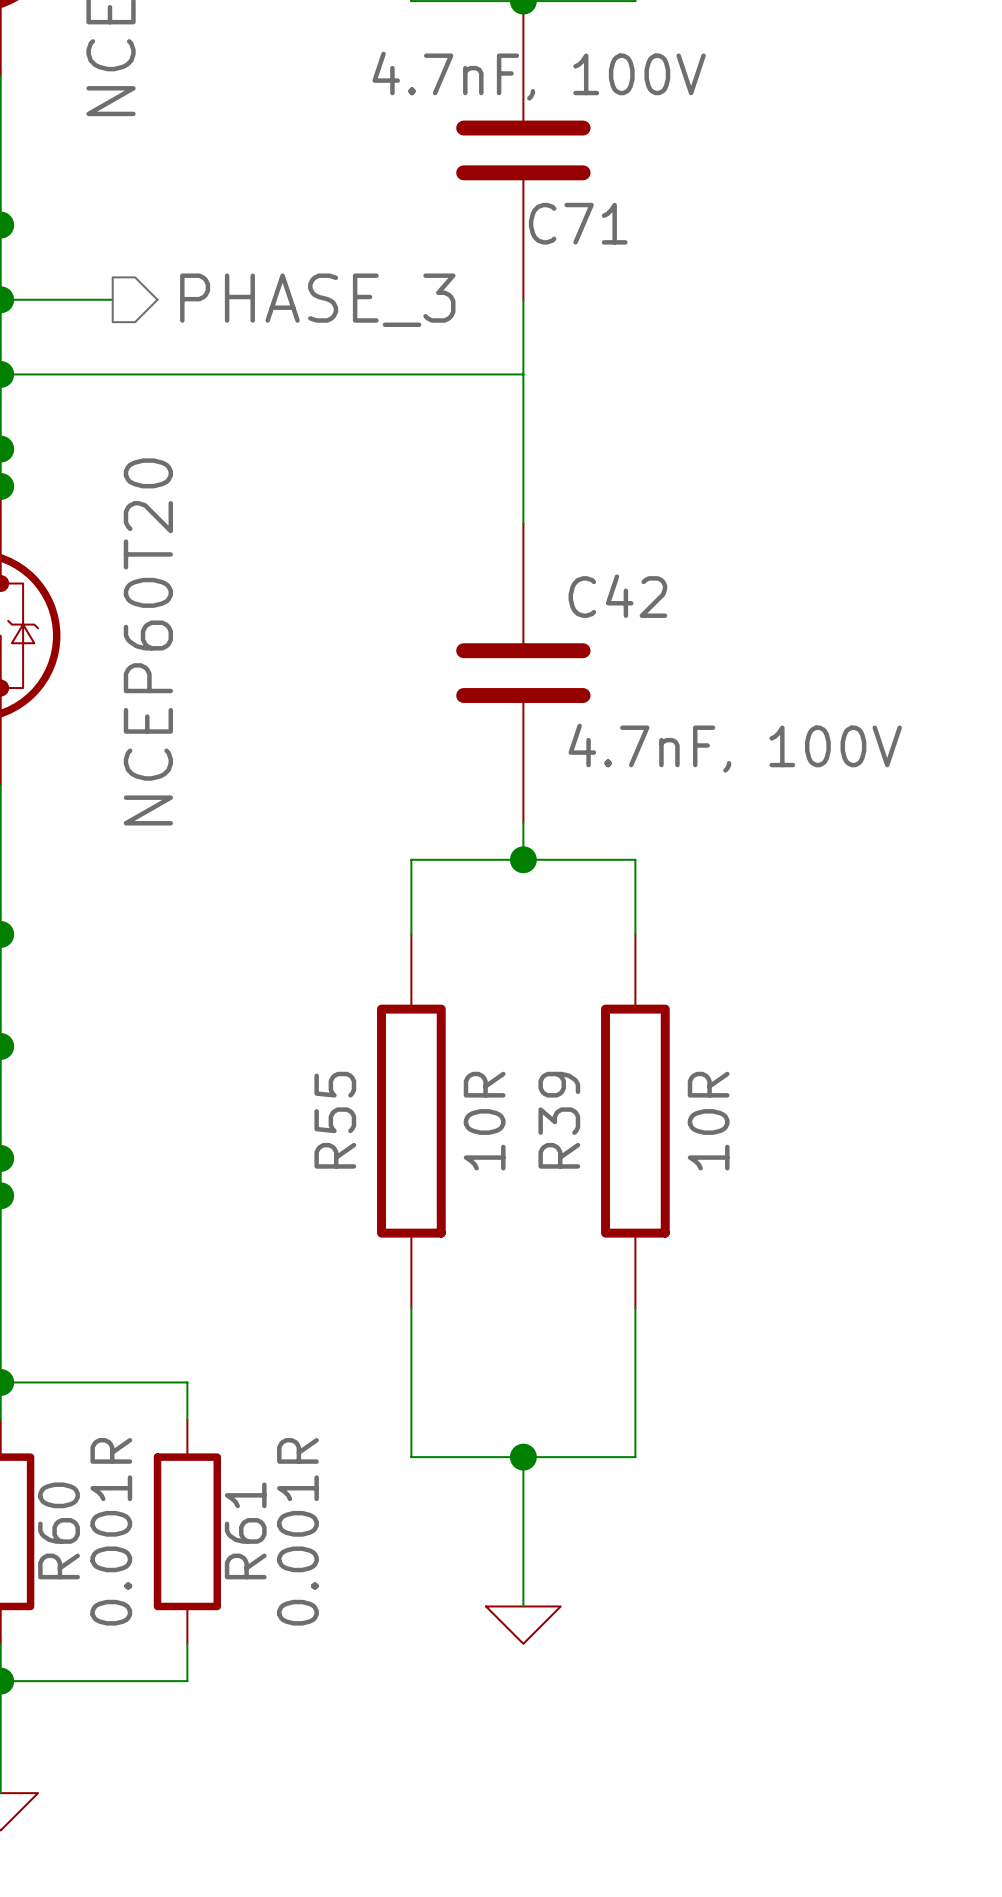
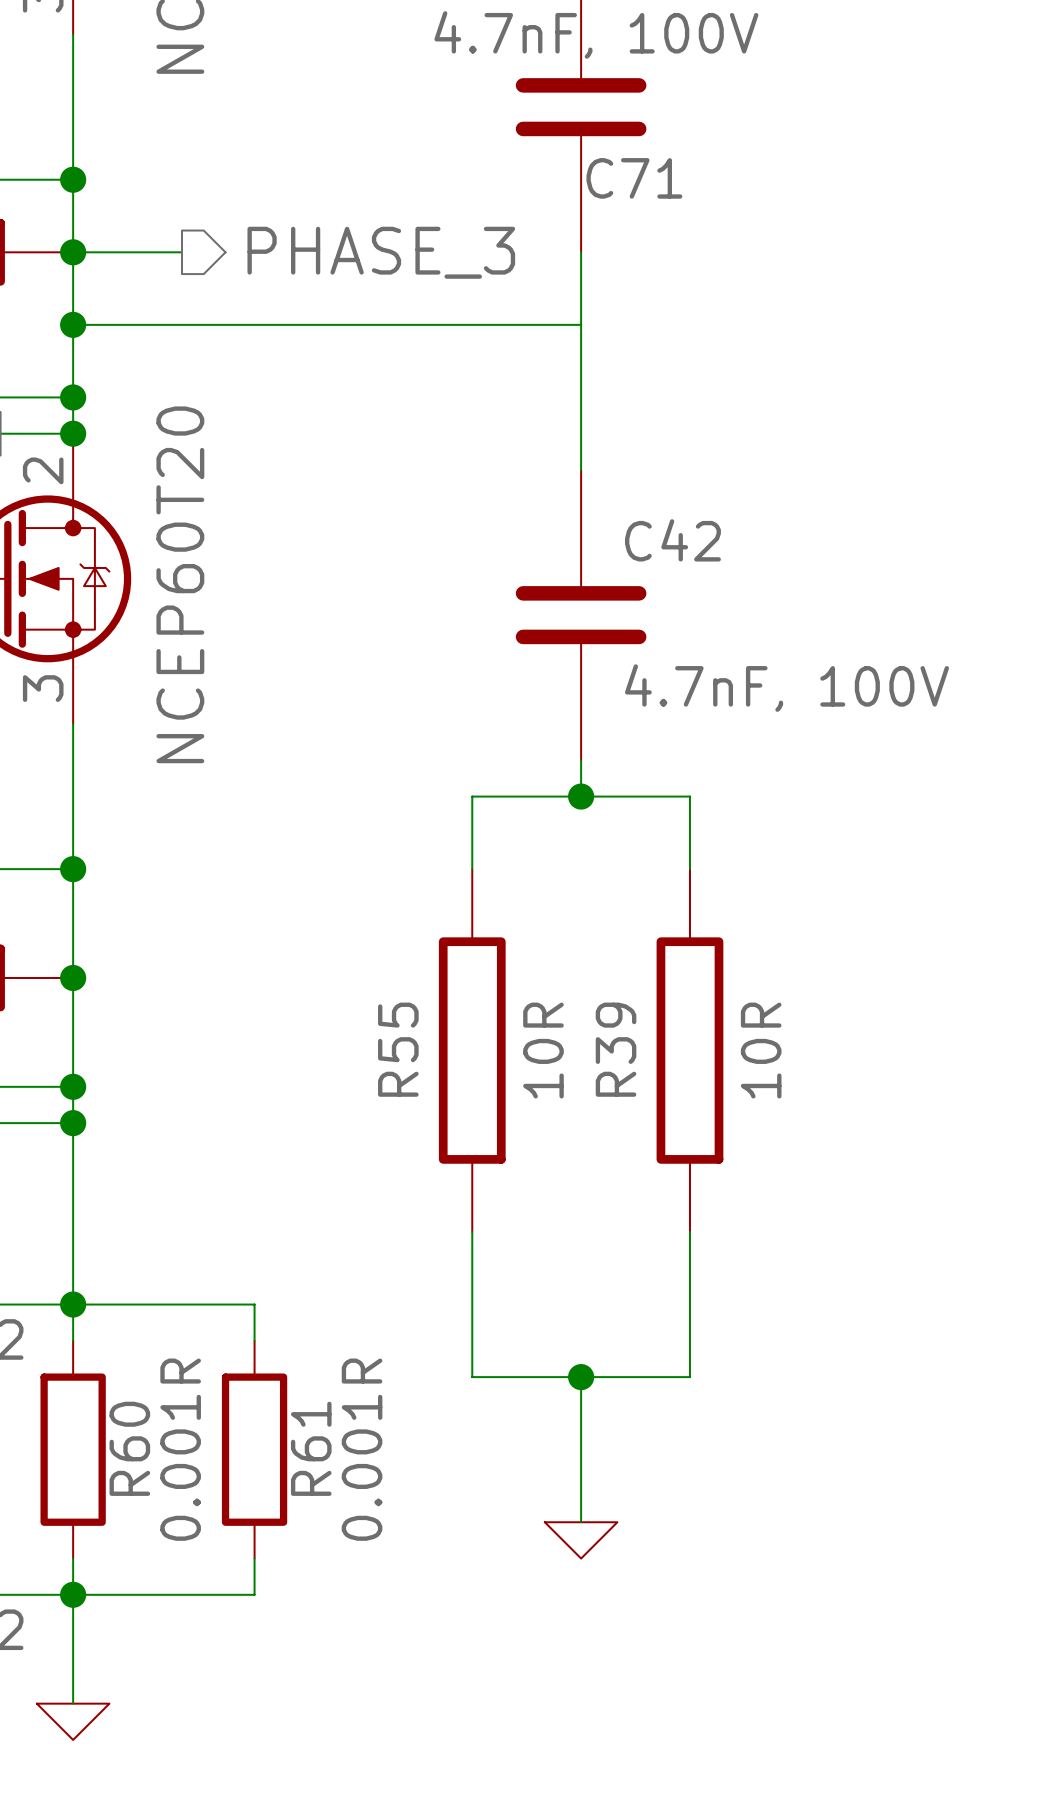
part value position: NCEP60T20 (148, 641) -> NCEP60T20 (180, 584)

